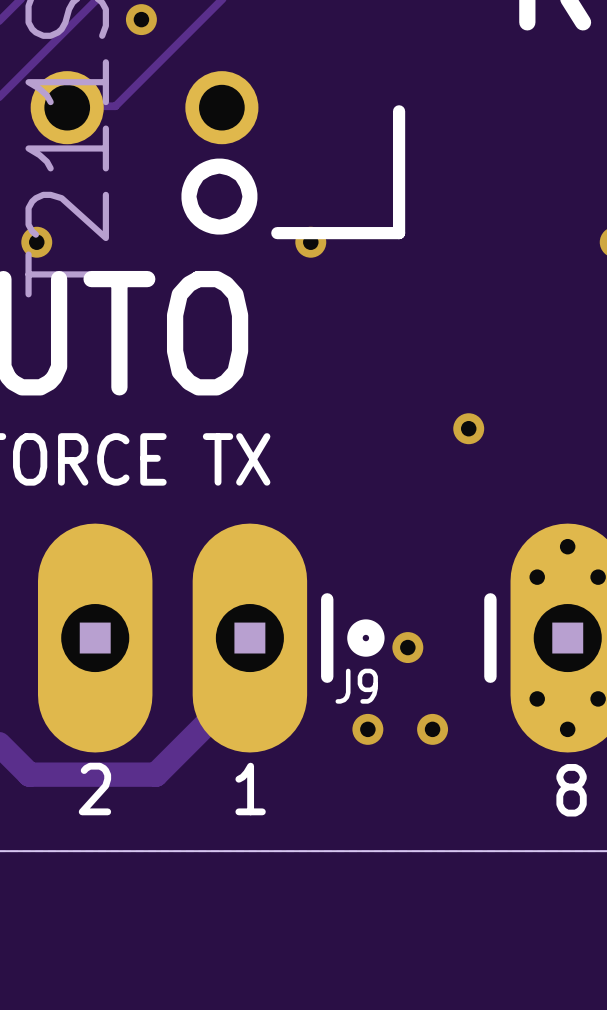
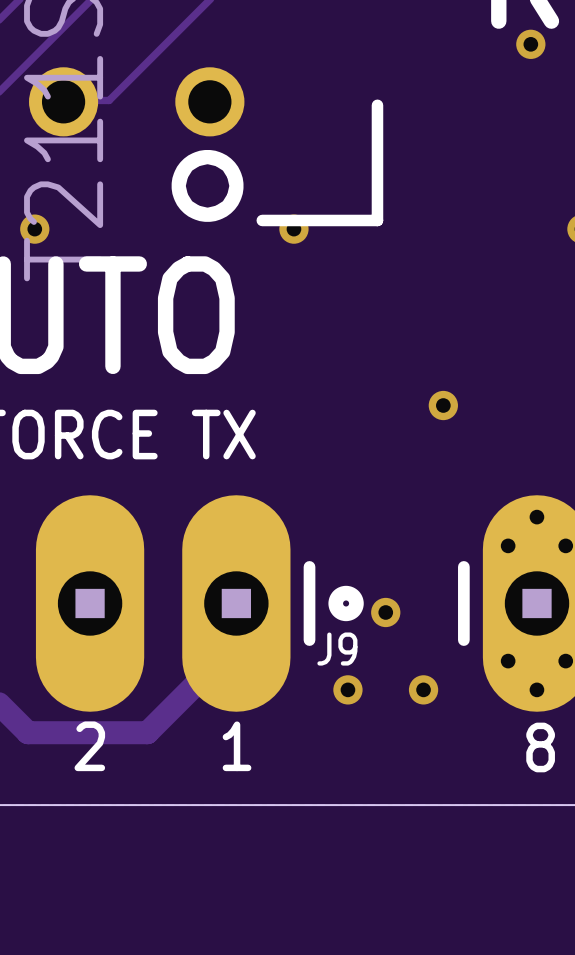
via: (141, 19) -> none
via: none -> (530, 44)
via position: (432, 729) -> (423, 689)

